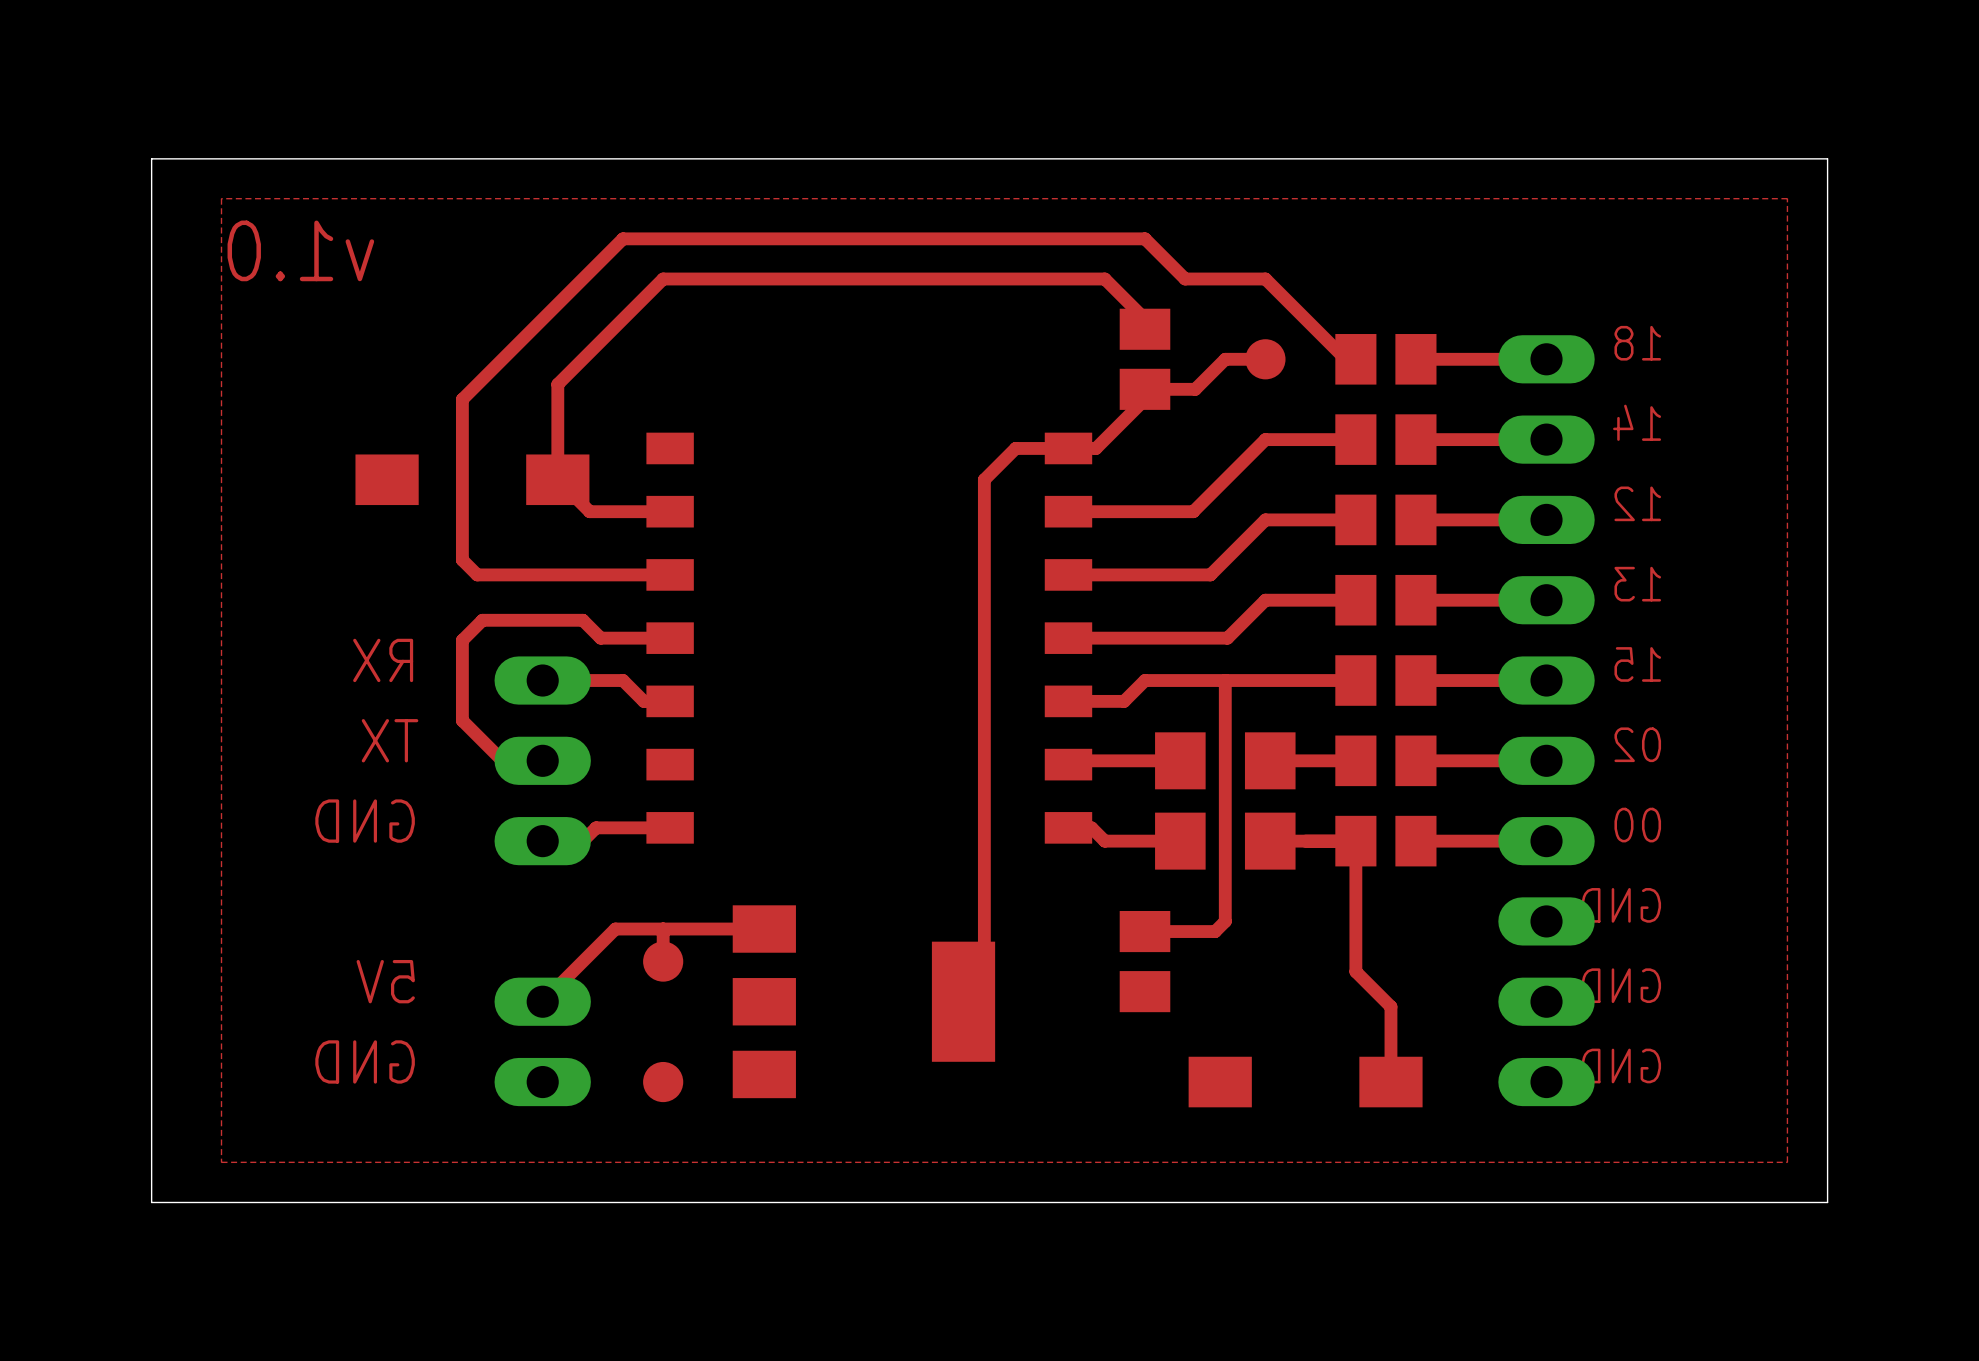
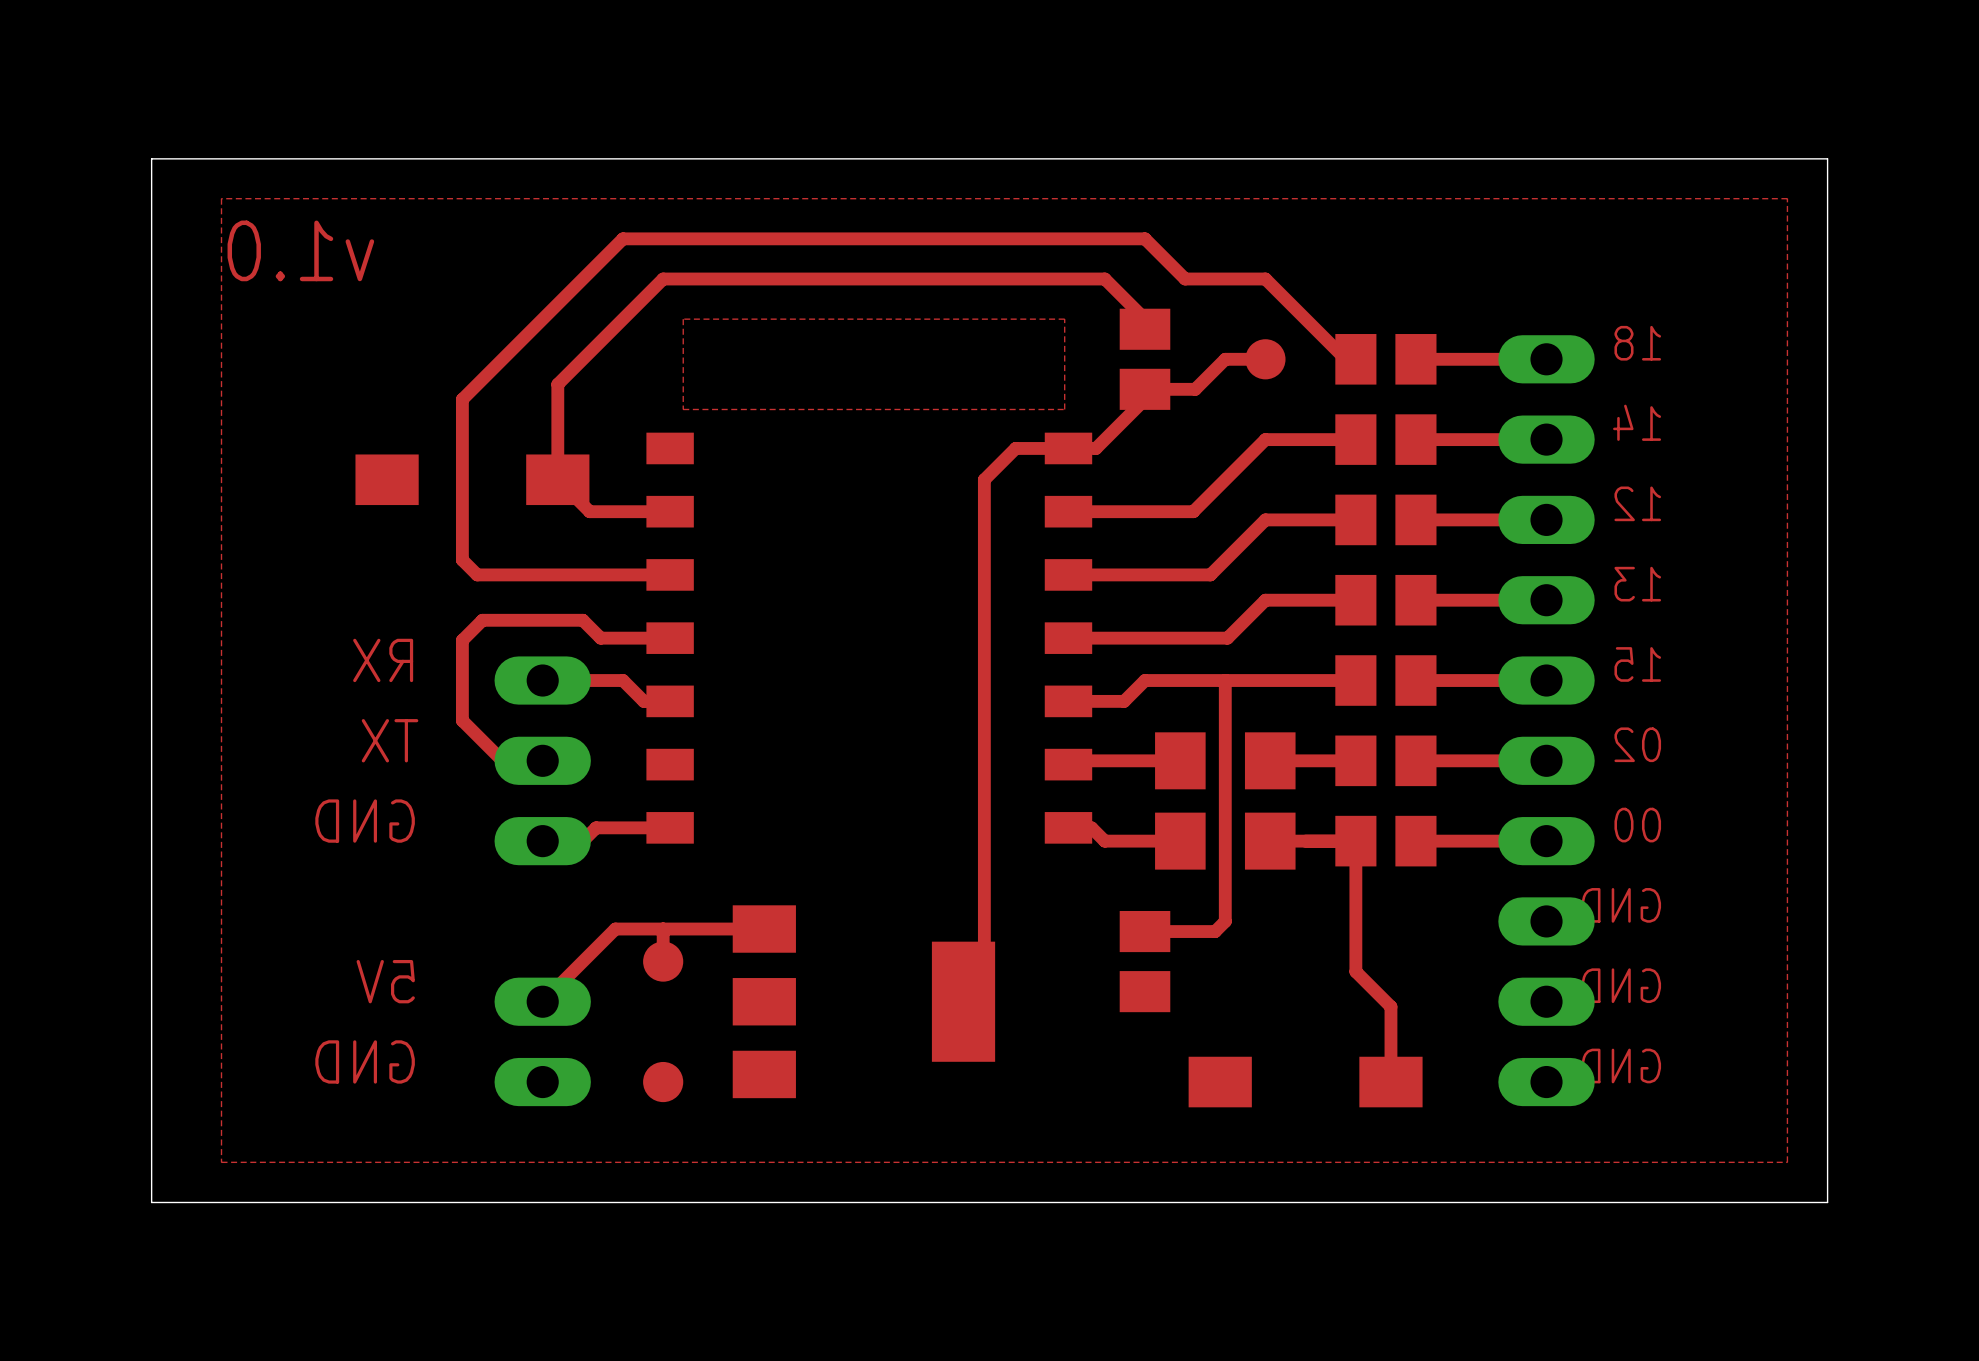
top zone outline: none -> (1064, 319) (683, 319) (683, 409) (1064, 409) (1064, 319)

